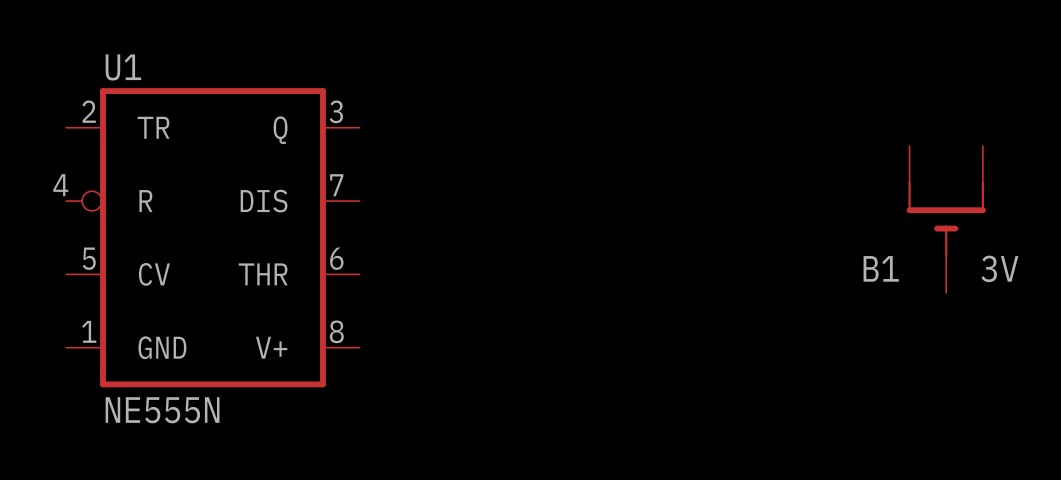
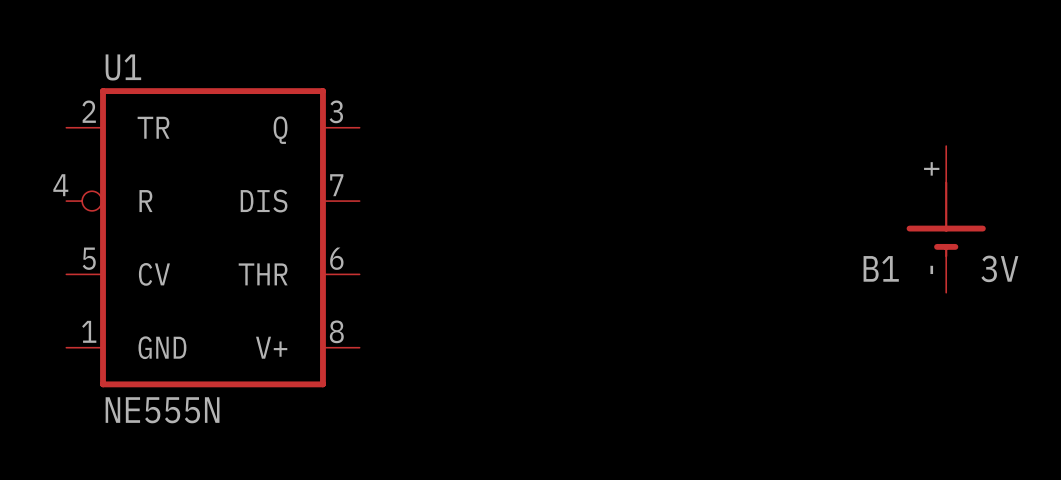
B1 symbol: [906, 146, 986, 293] -> [906, 146, 986, 293]

